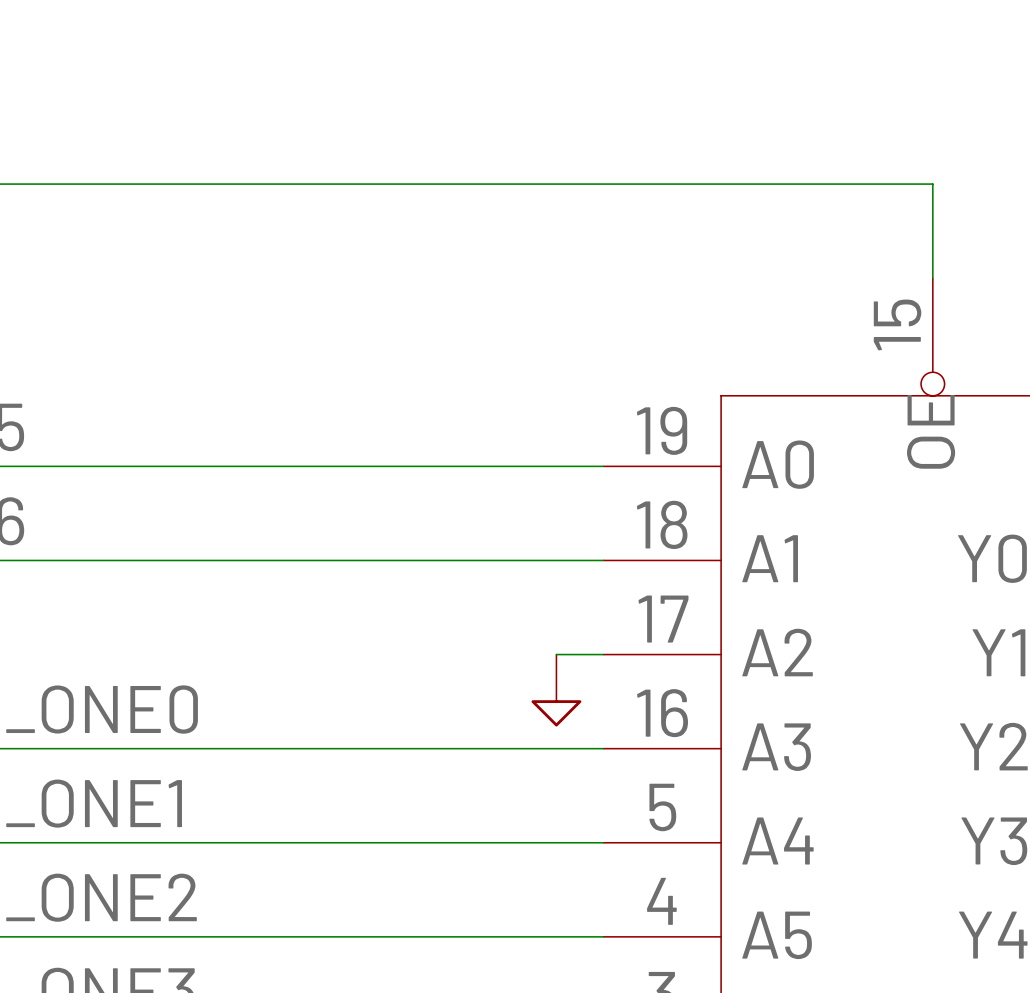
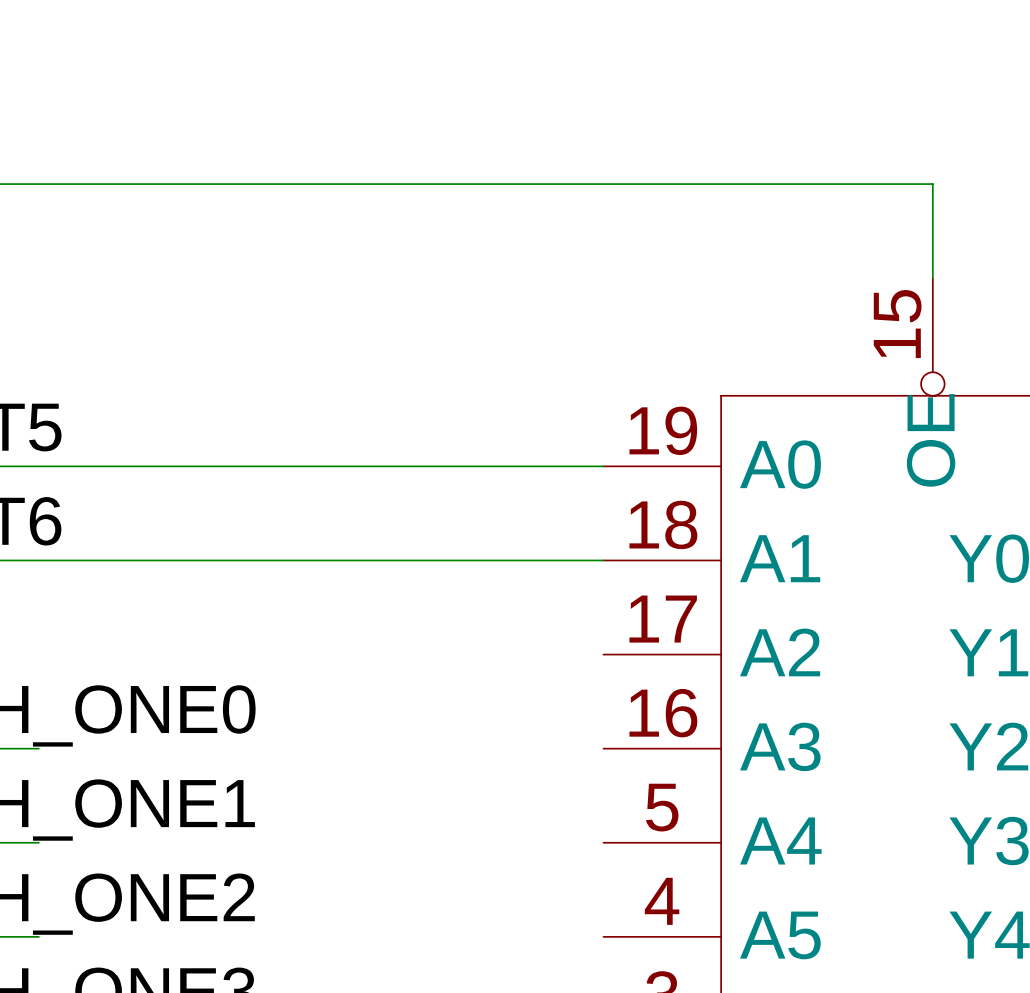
wire: (556, 654) (603, 654) -> none
power symbol: (556, 690) -> none
wire: (38, 748) (603, 748) -> none
wire: (38, 842) (603, 842) -> none
wire: (38, 936) (603, 936) -> none

